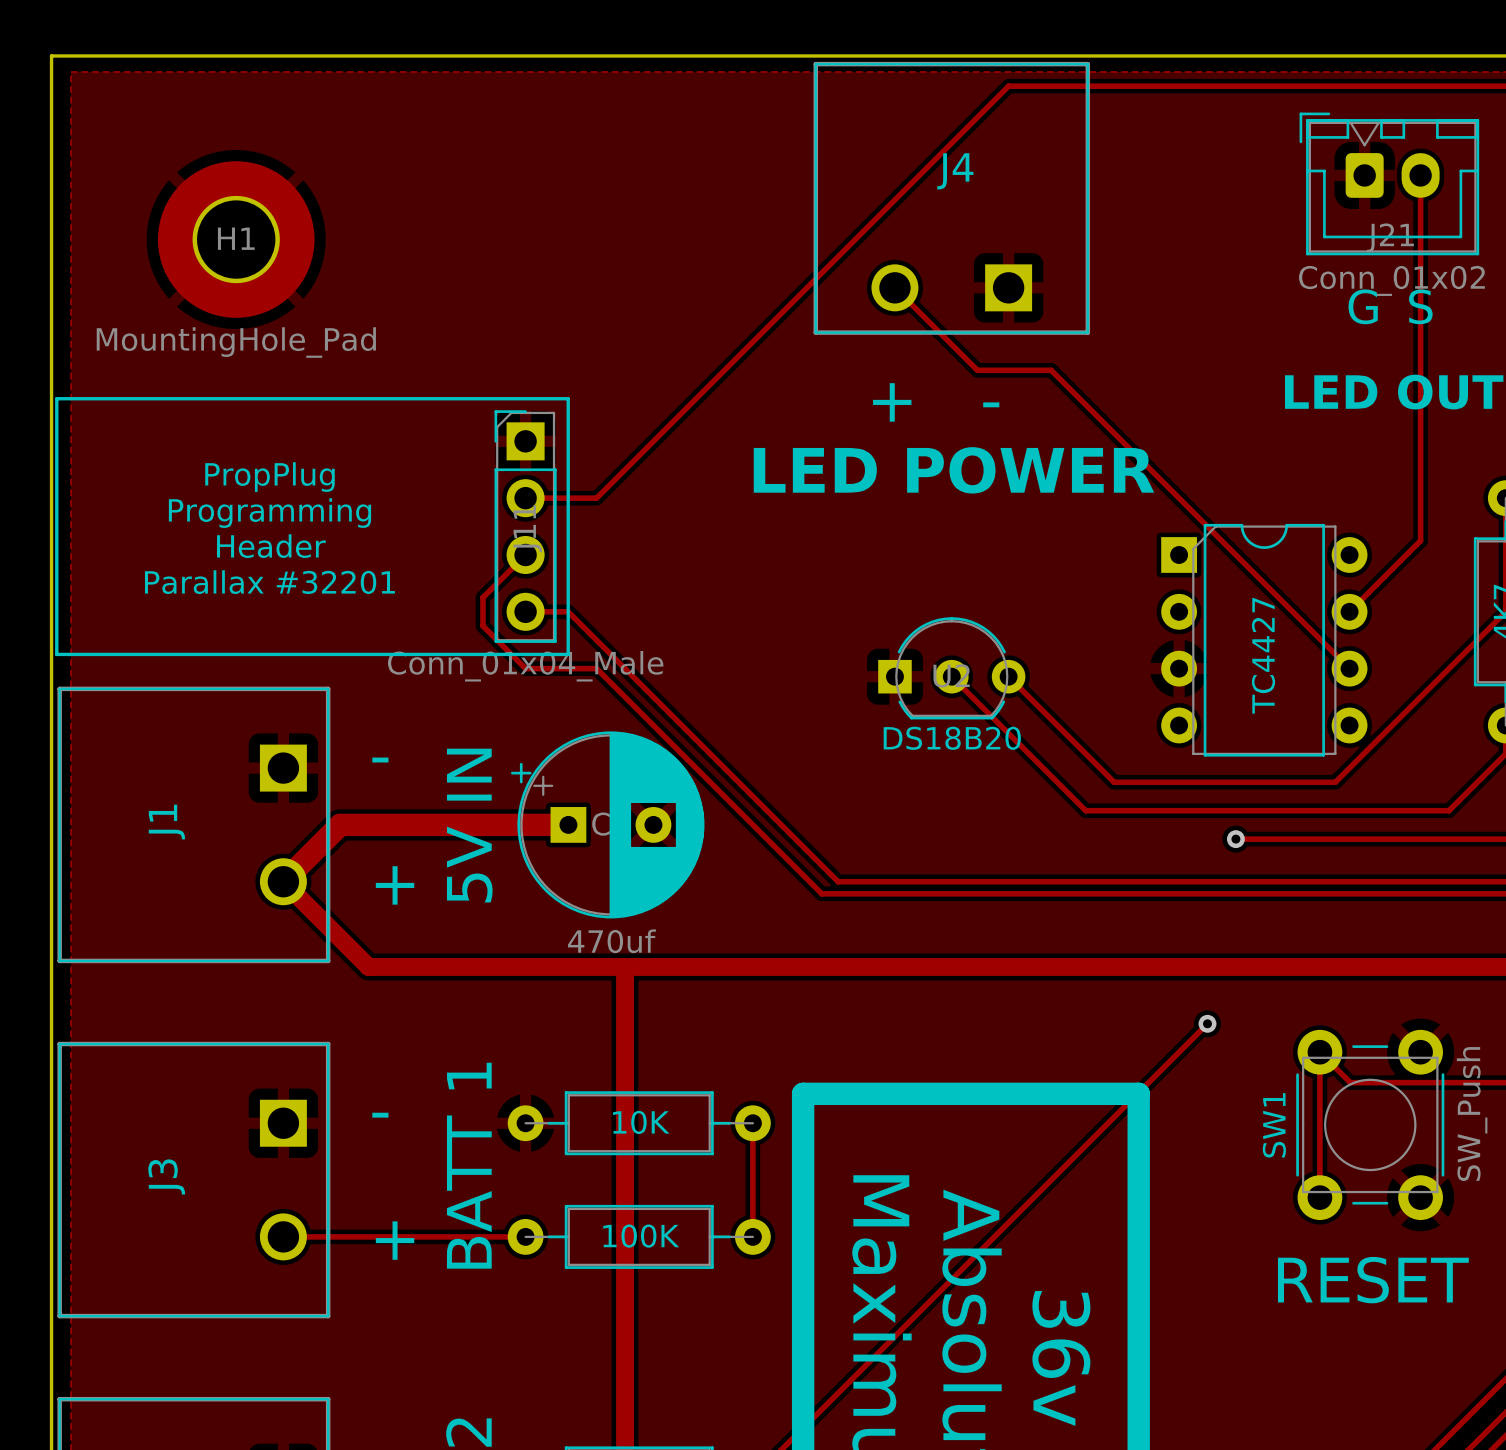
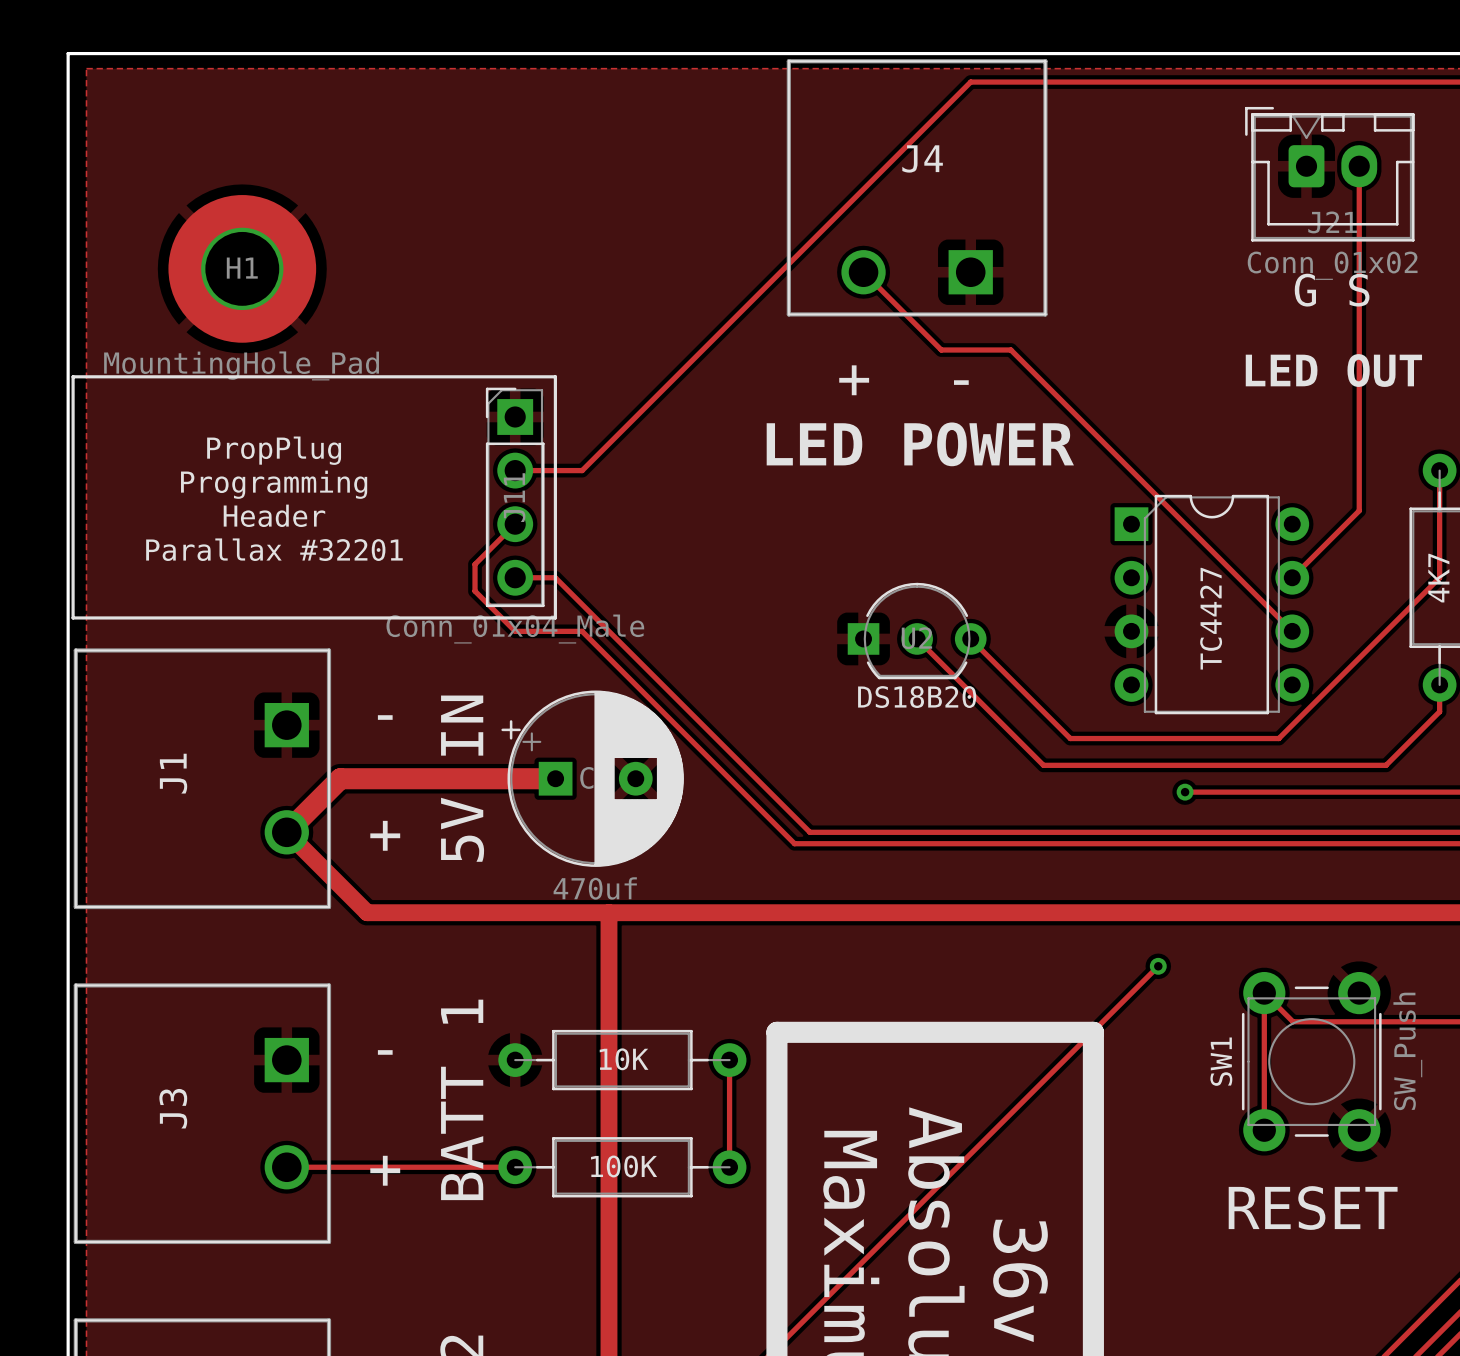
H1 position: (236, 239) -> (242, 268)

